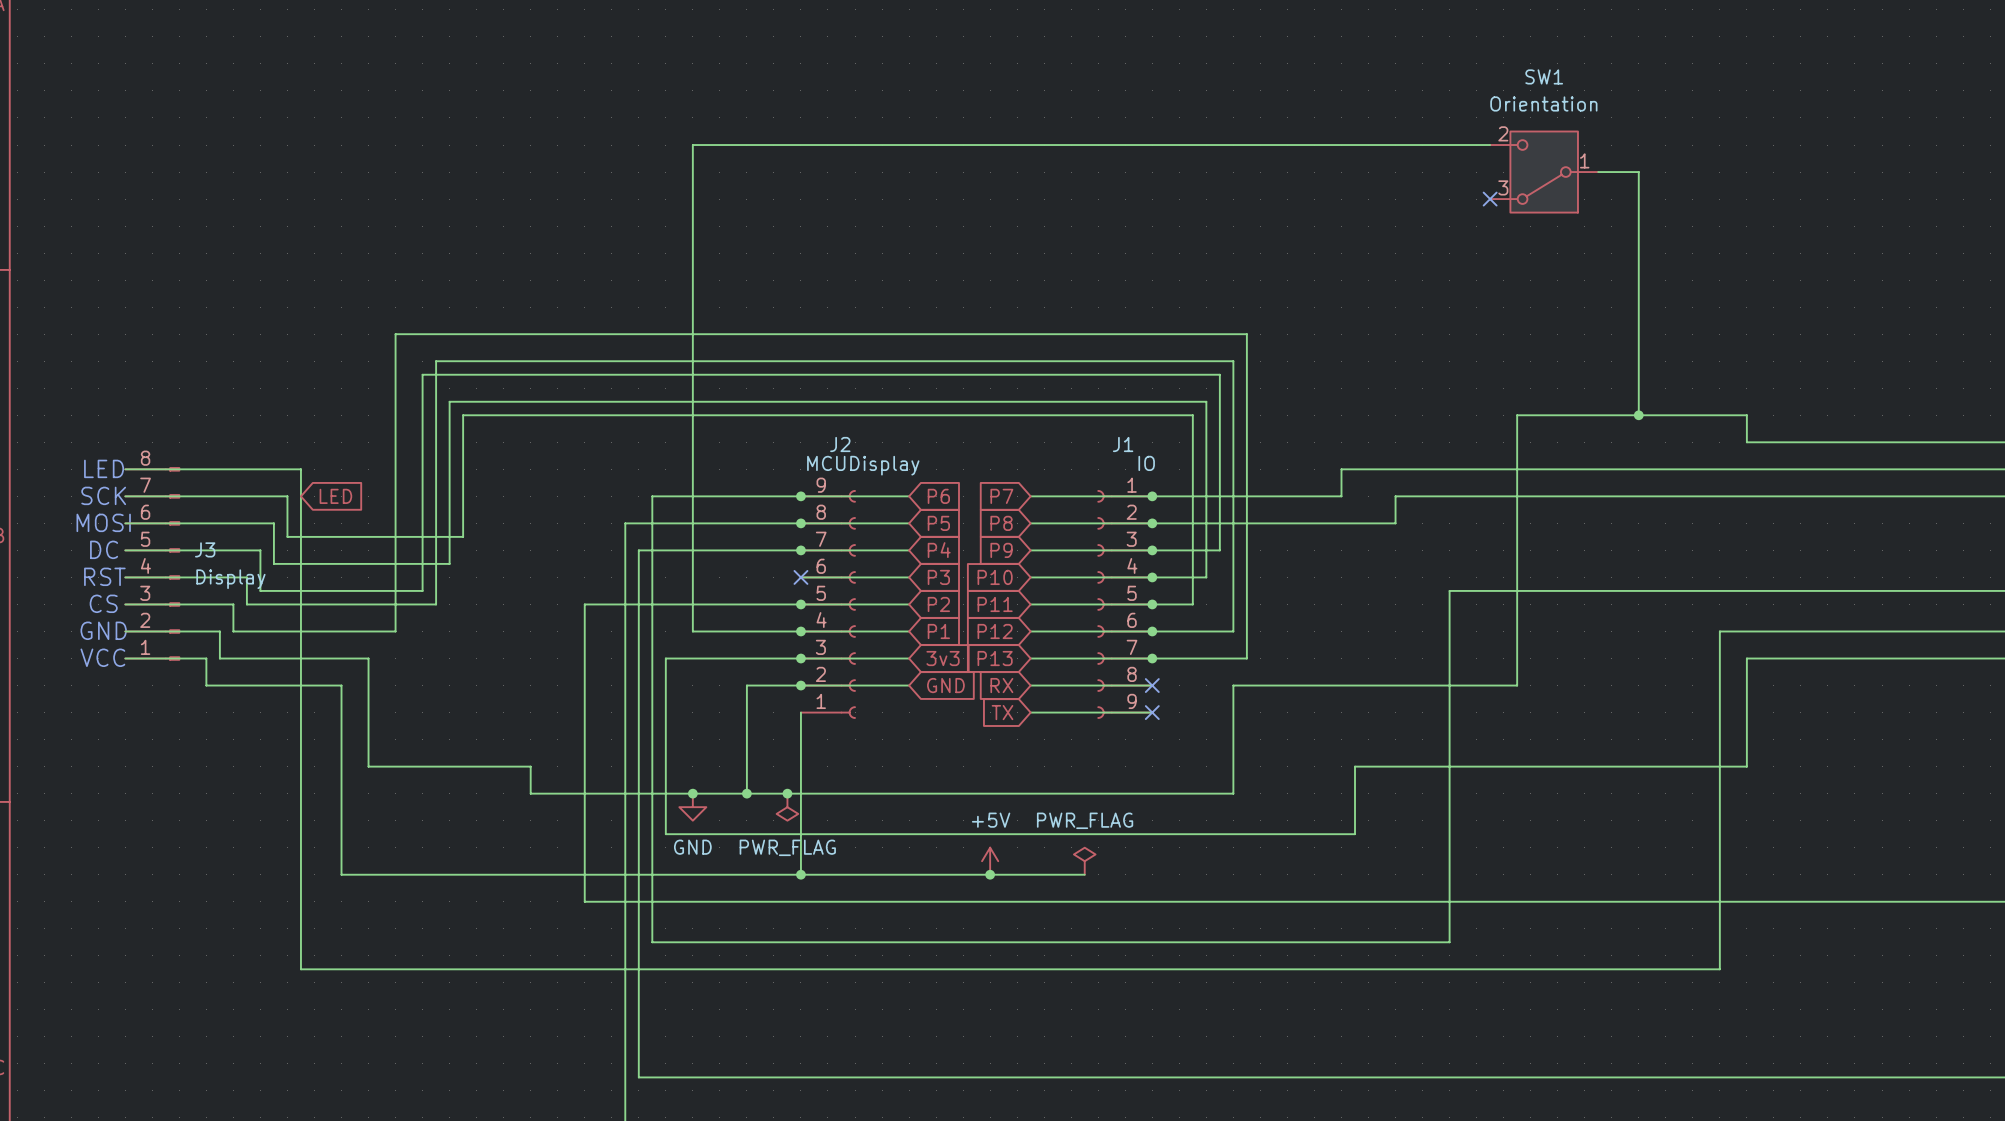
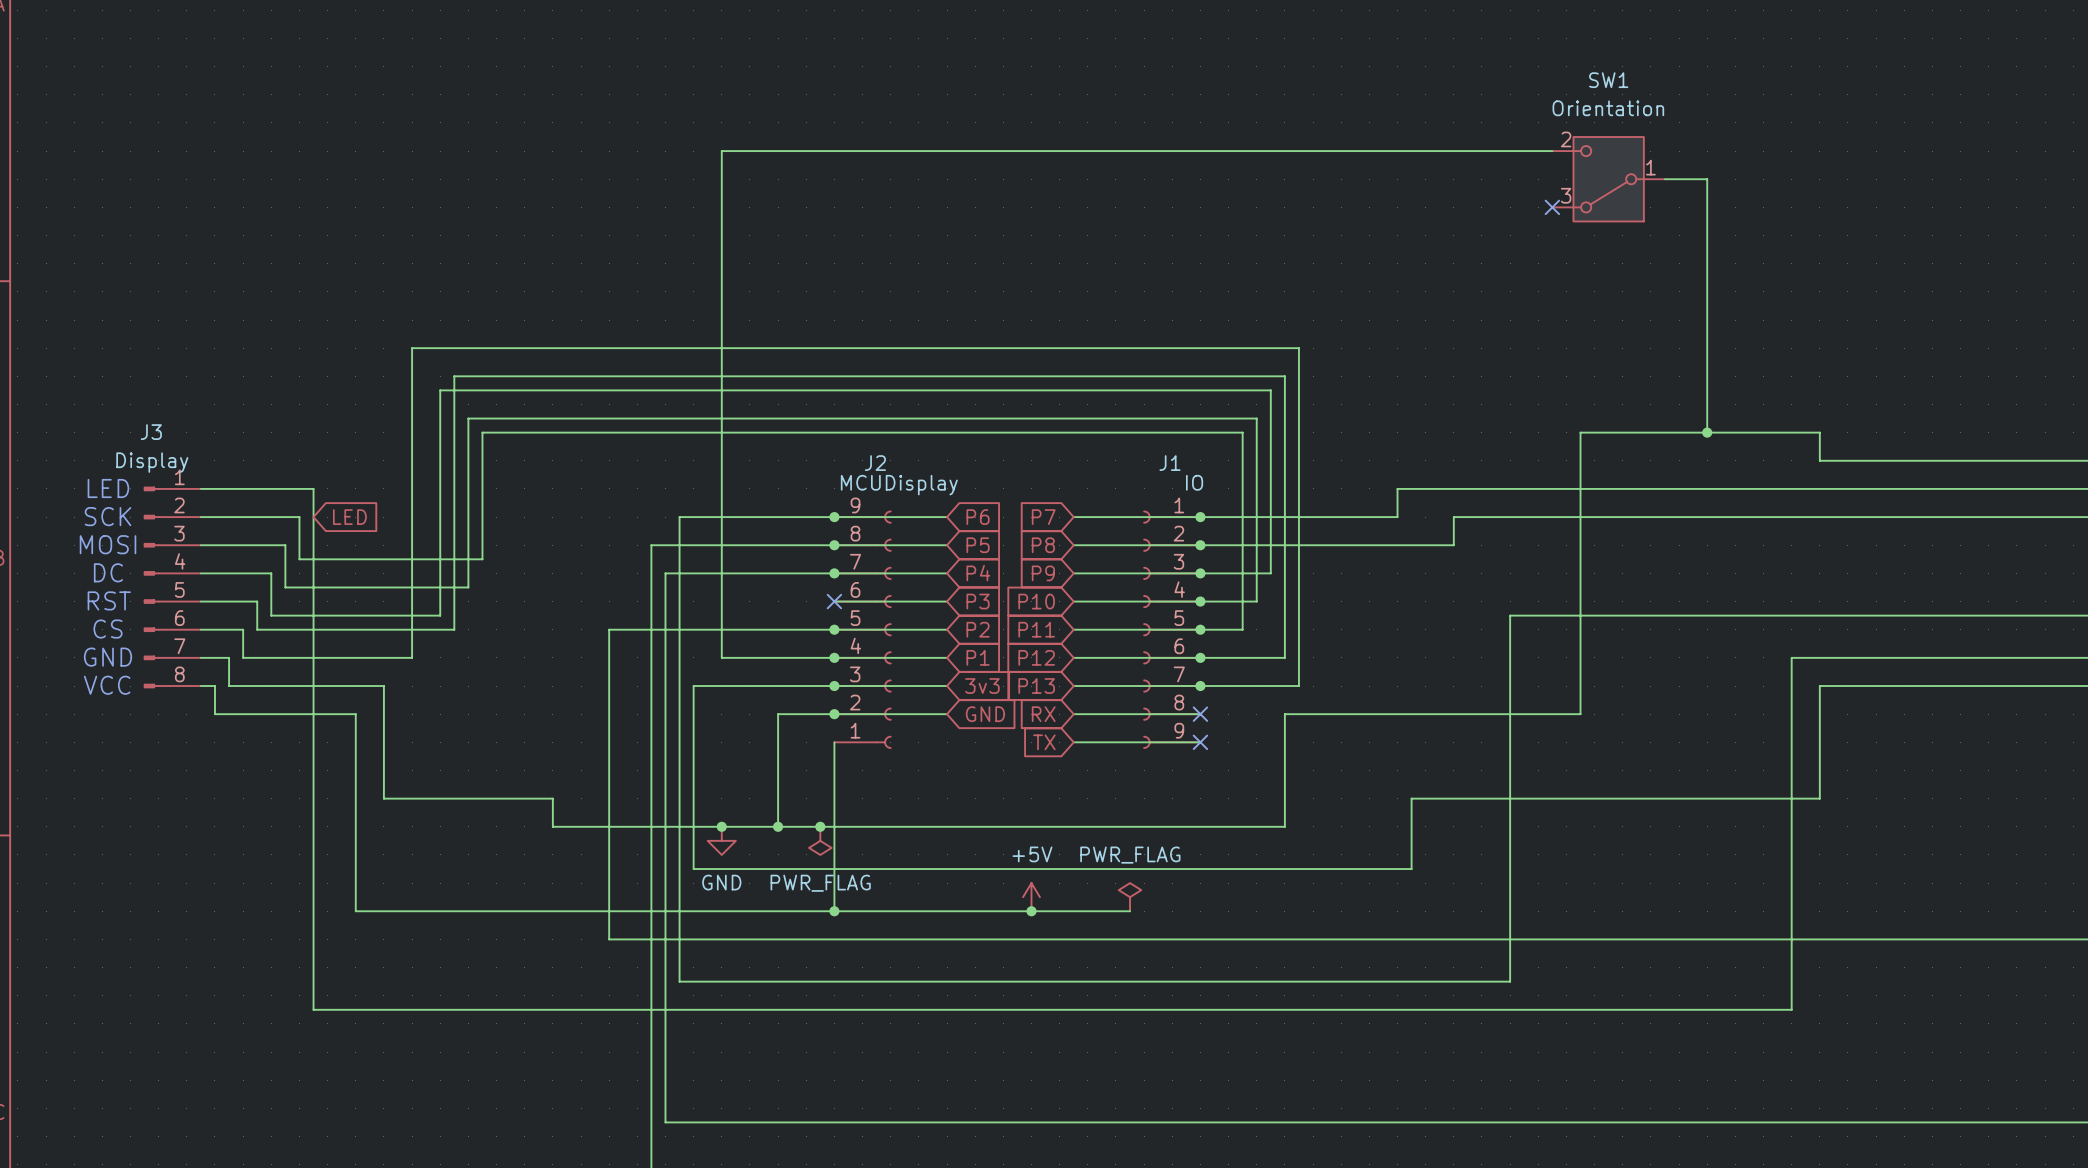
J3 name position: J3 (205, 549) -> J3 (151, 432)
J3 rotation: 0° (172, 563) -> 180° (151, 587)
J3 value position: Display (230, 579) -> Display (152, 462)

